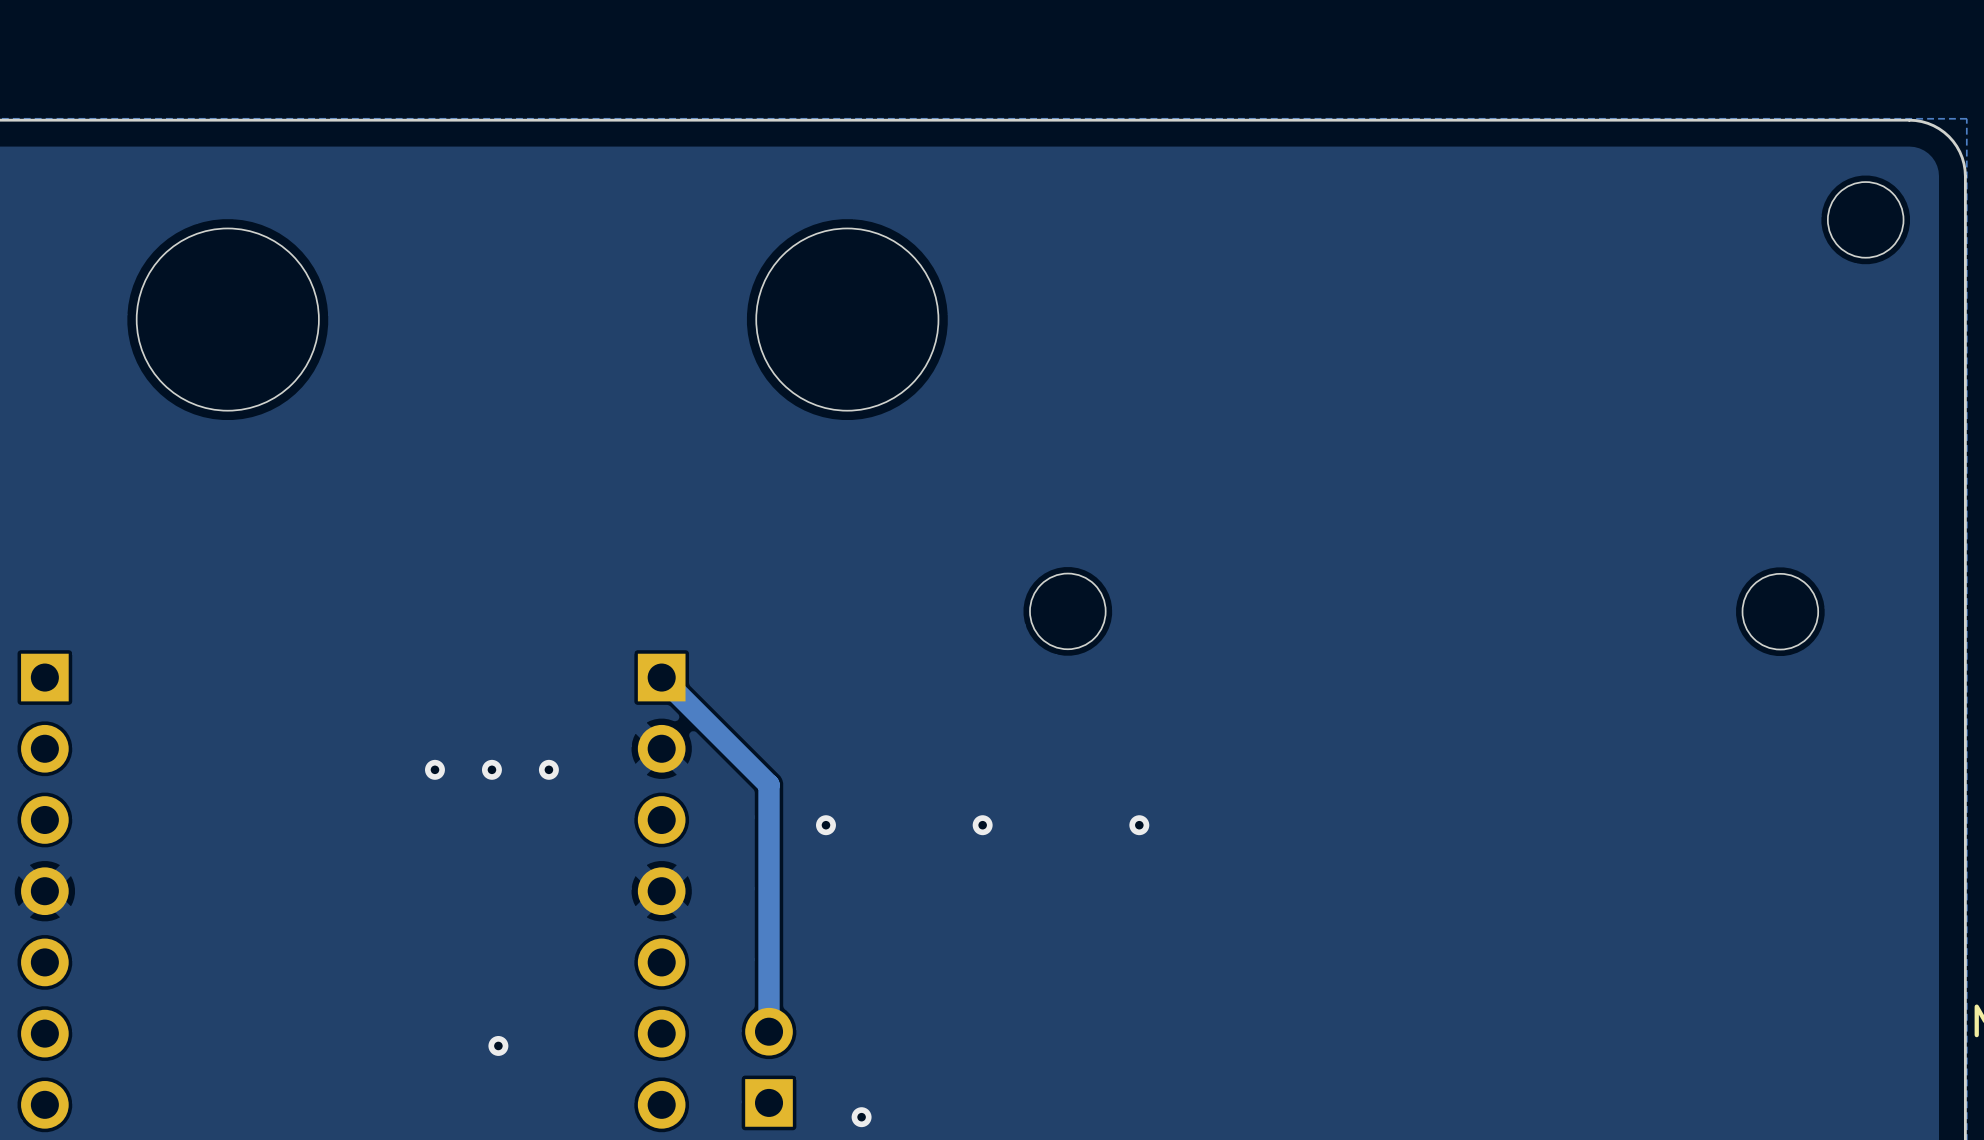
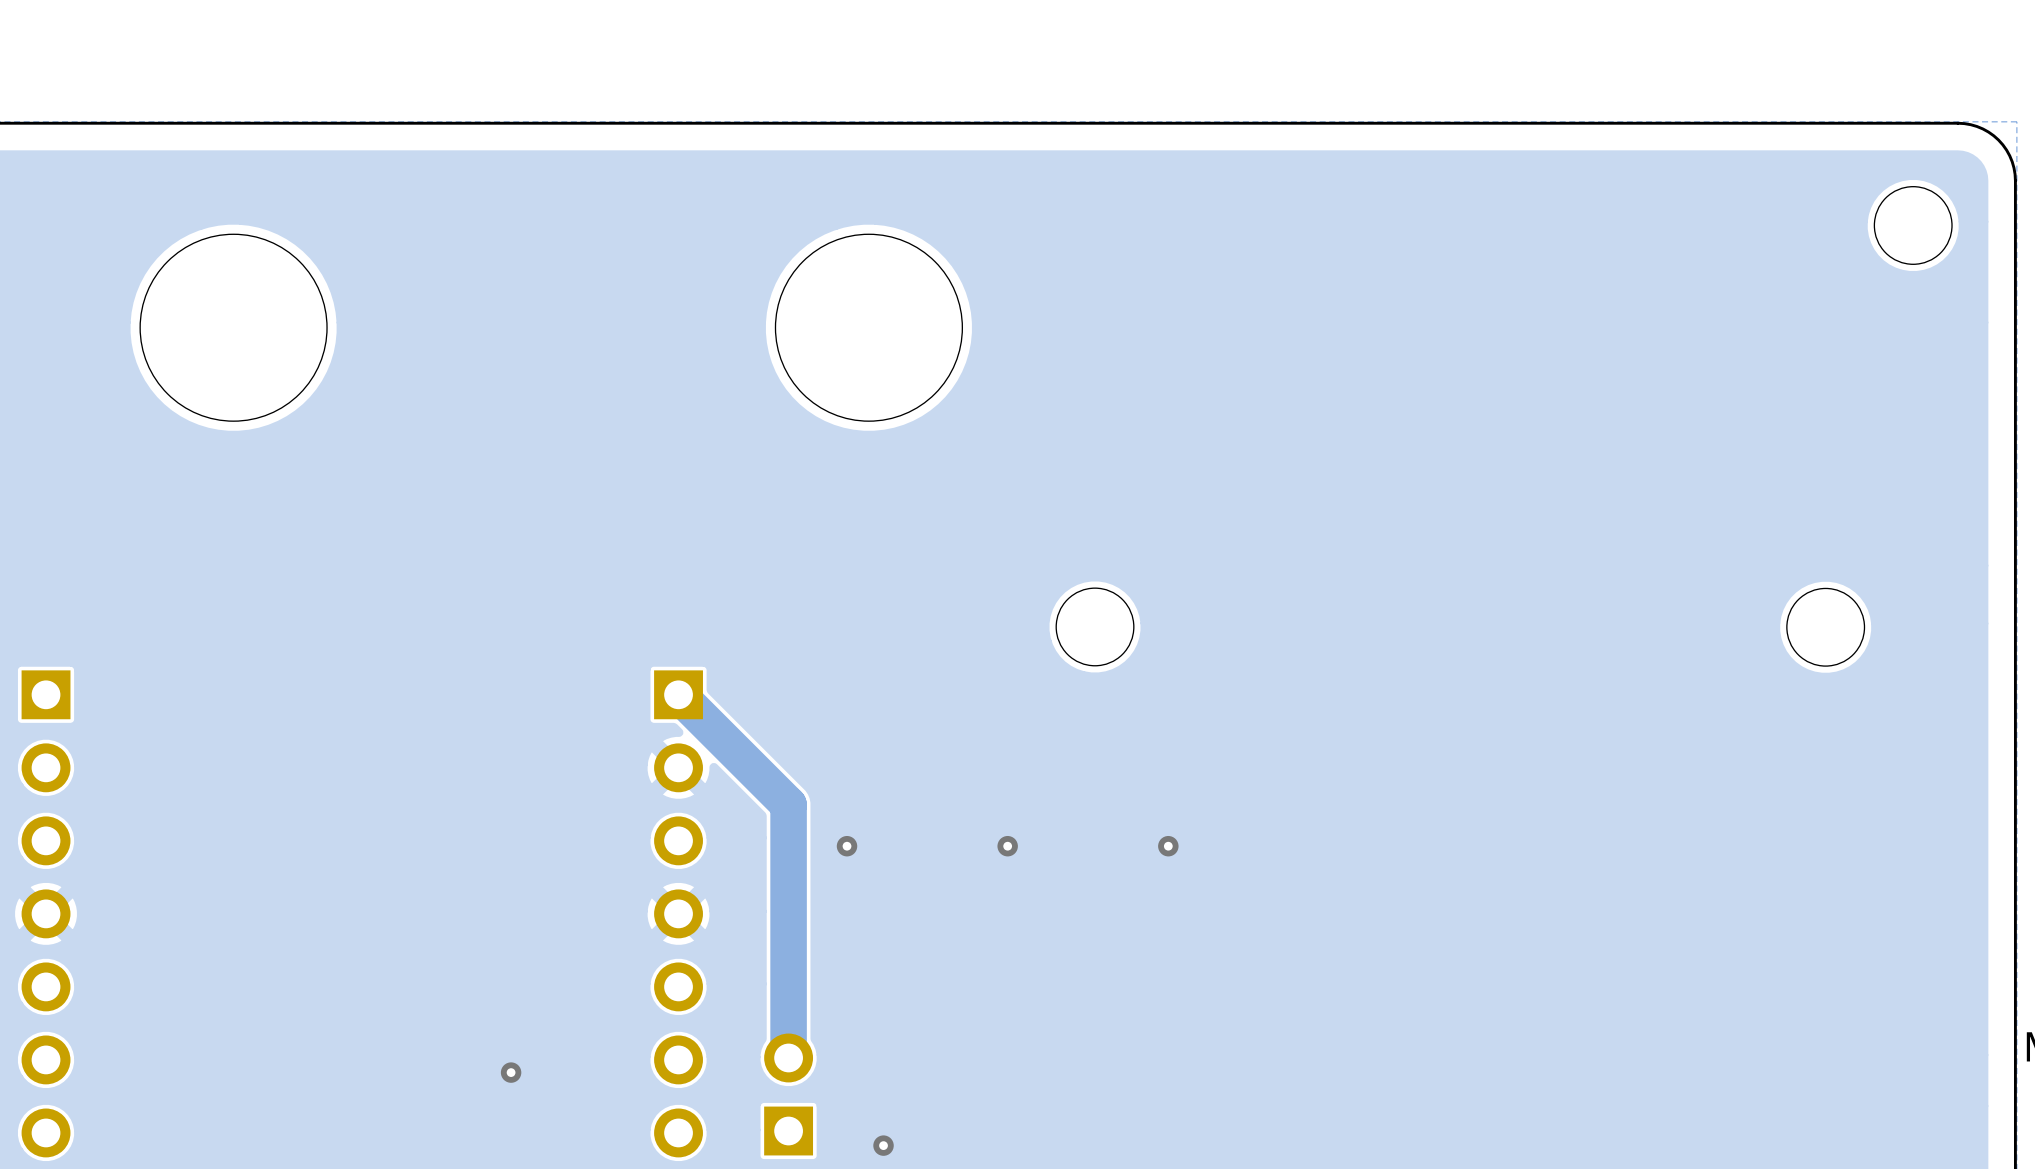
track width: thin (661, 677) (769, 784) (769, 1031) -> thick (678, 694) (788, 804) (788, 1057)
via: (434, 769) -> none
via: (491, 769) -> none
via: (548, 769) -> none

